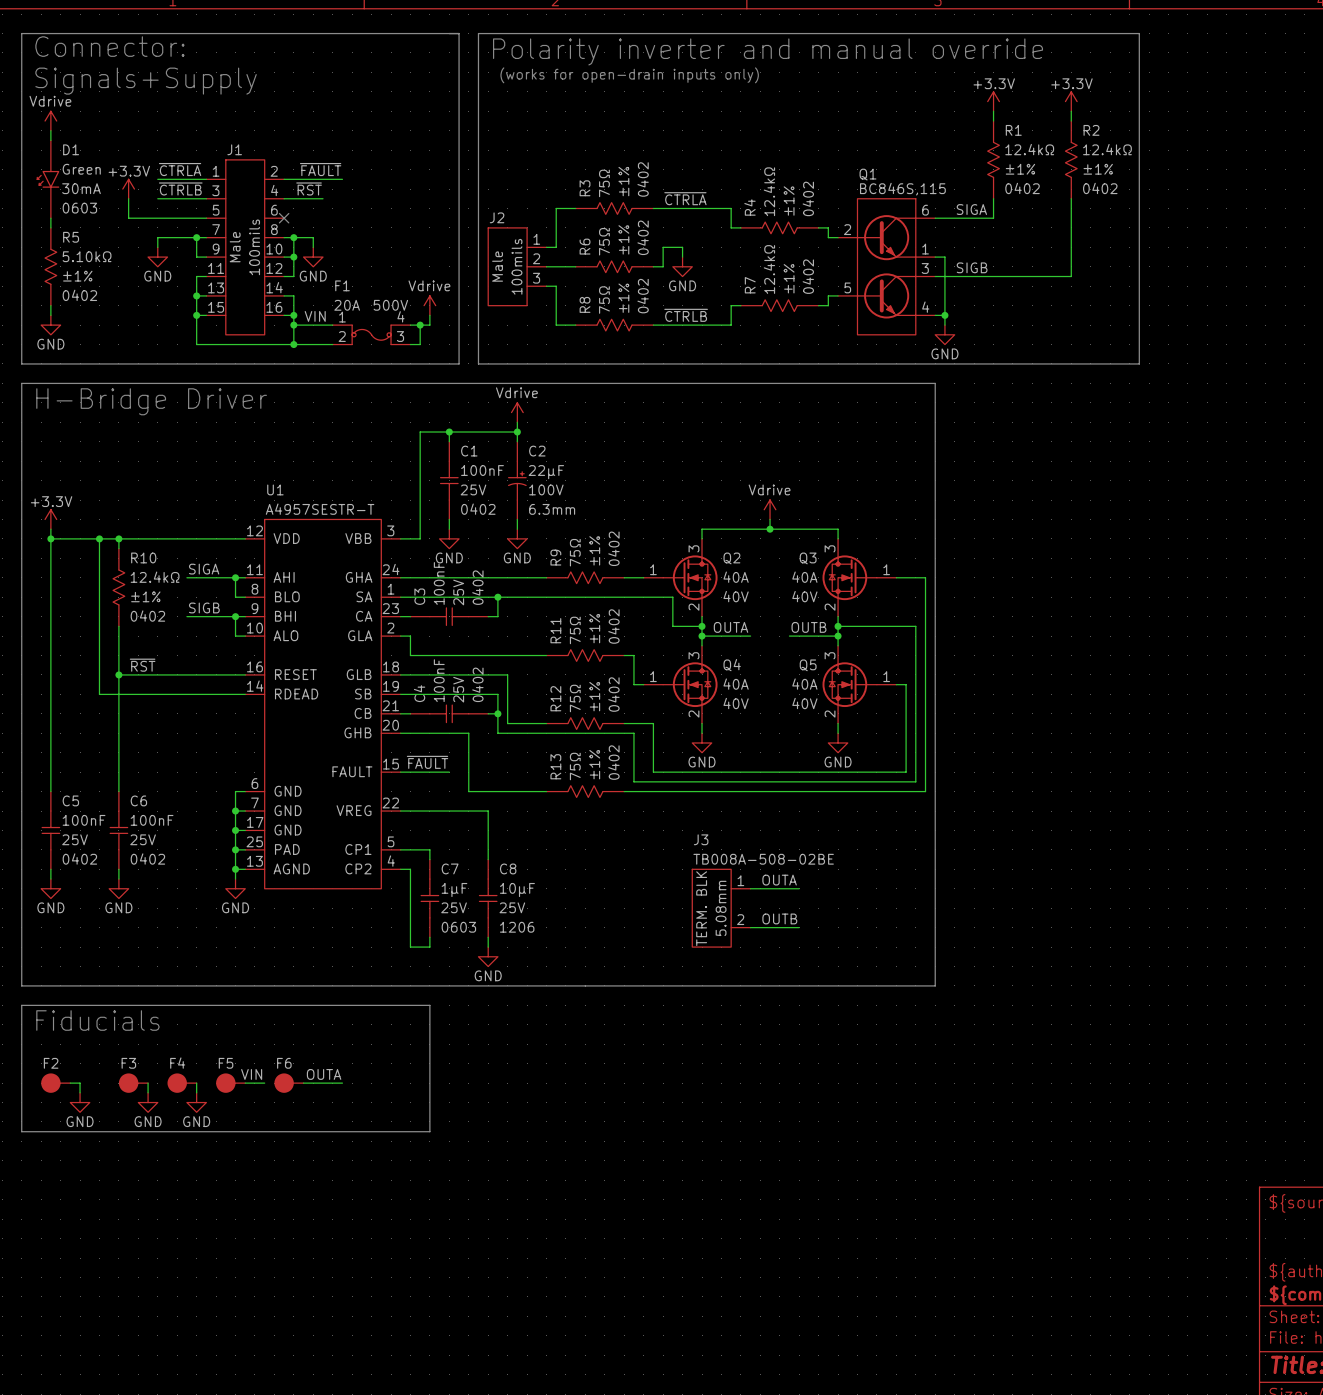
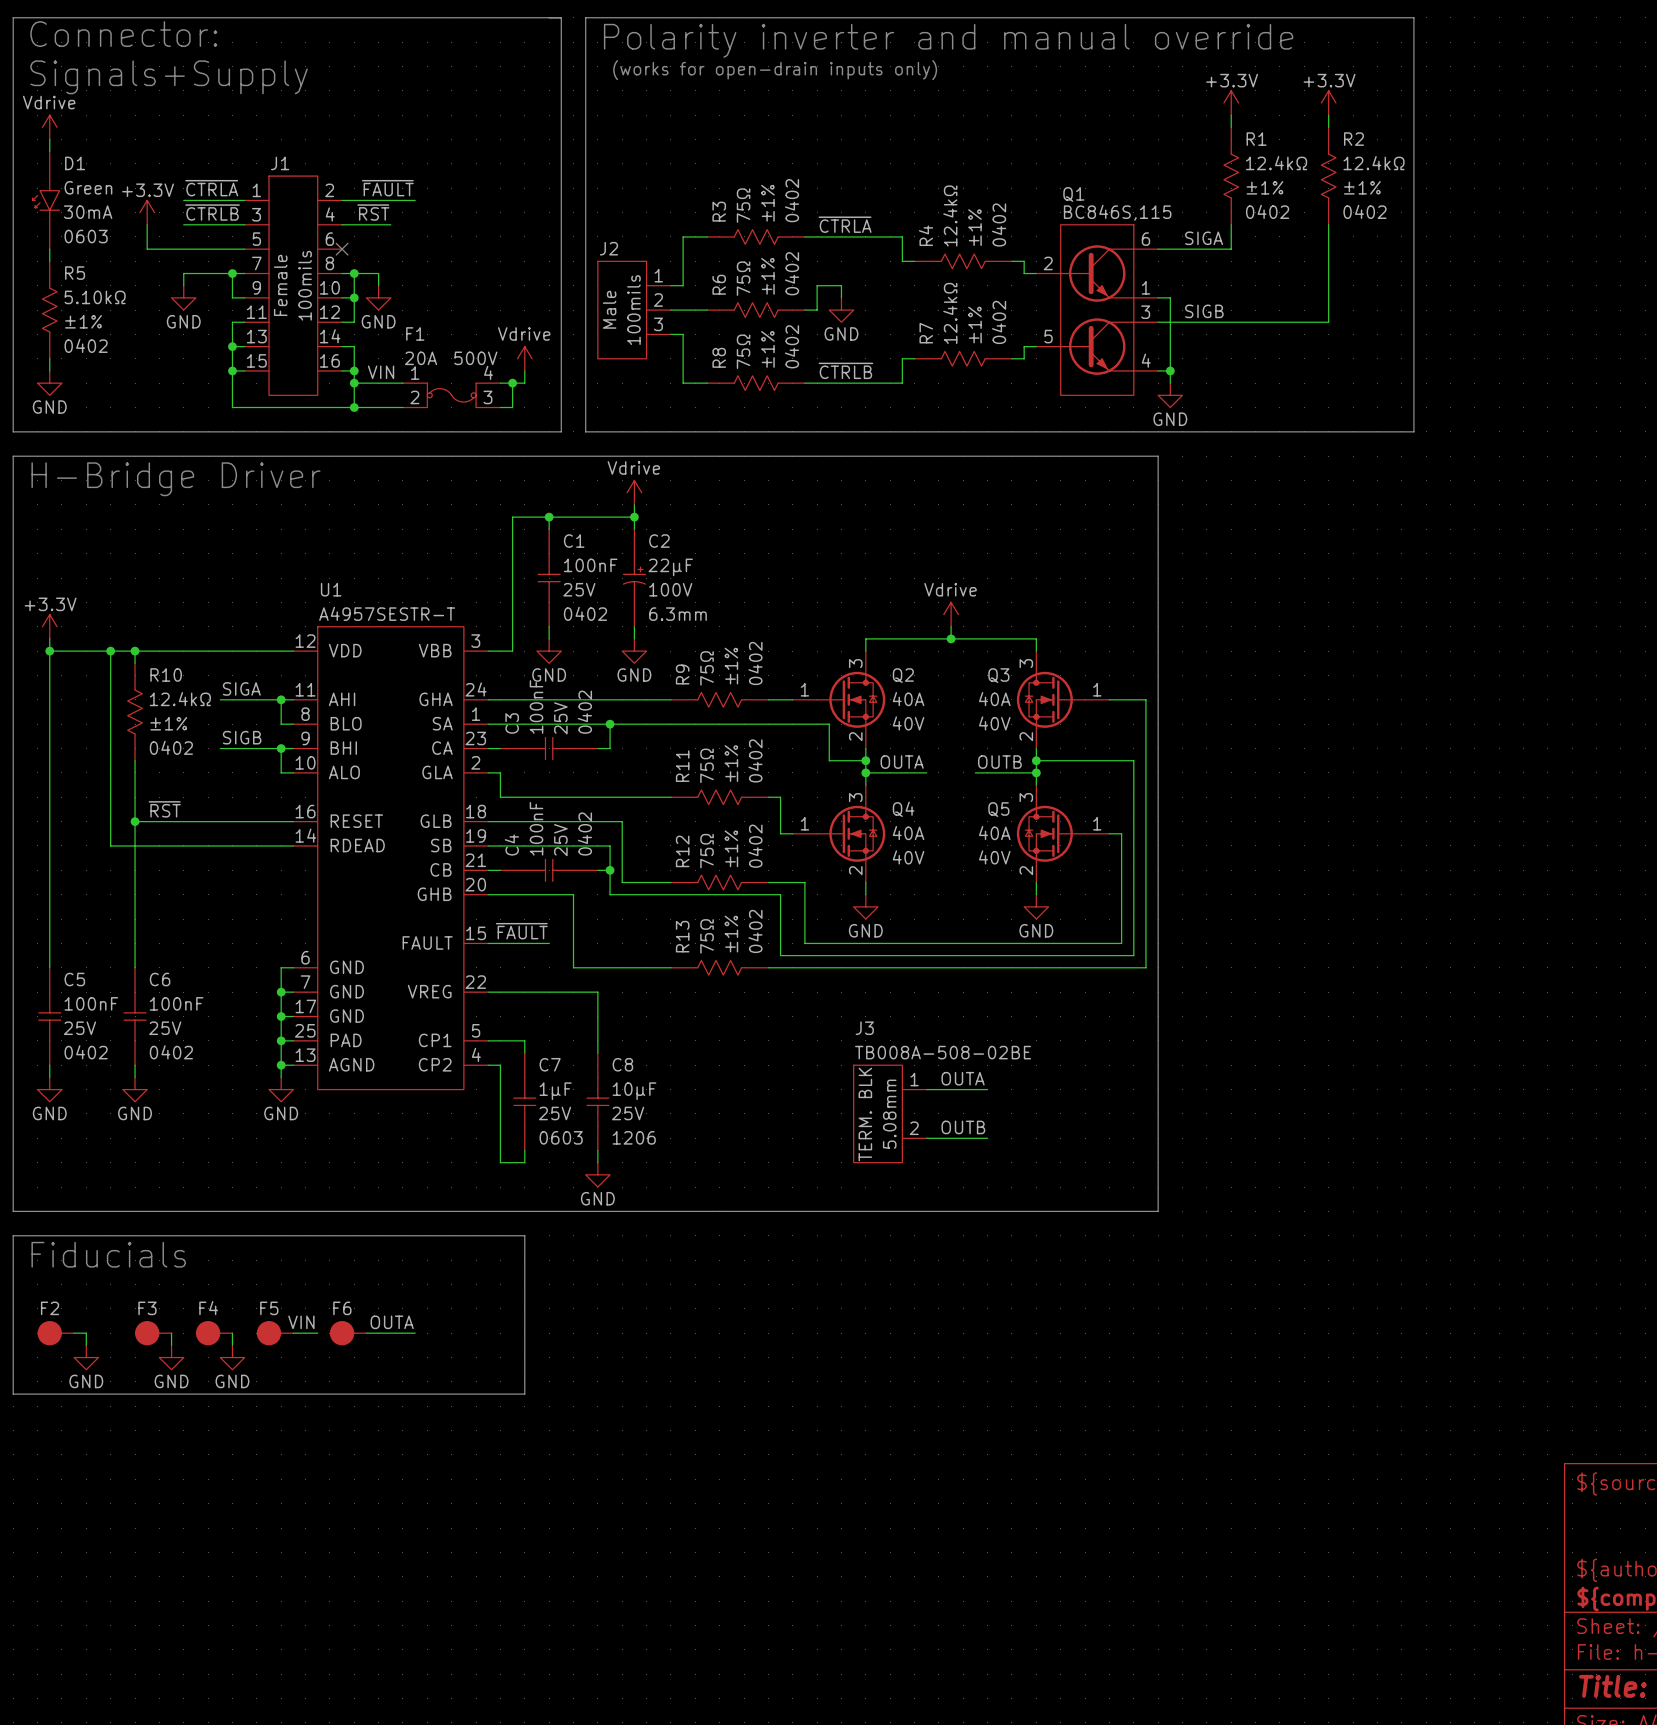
J1 text: Male (235, 247) -> Female (280, 285)

